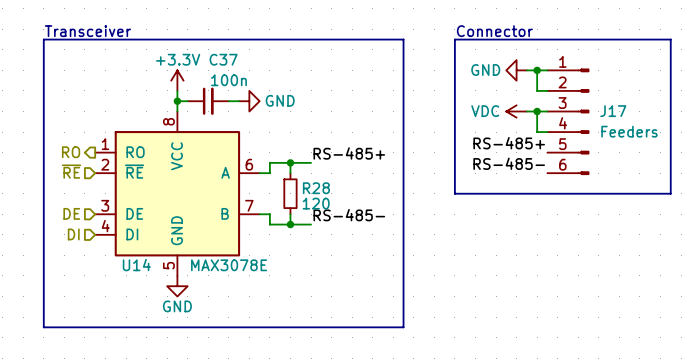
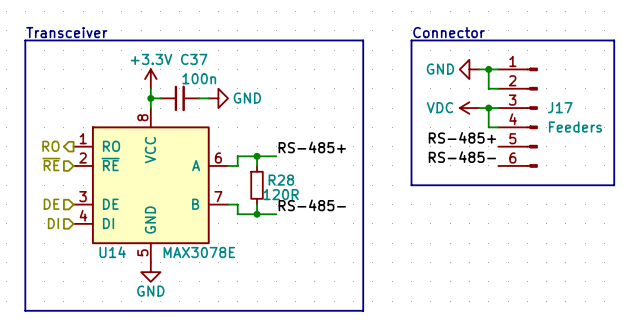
R28 value: 120 (316, 203) -> 120R (281, 194)

